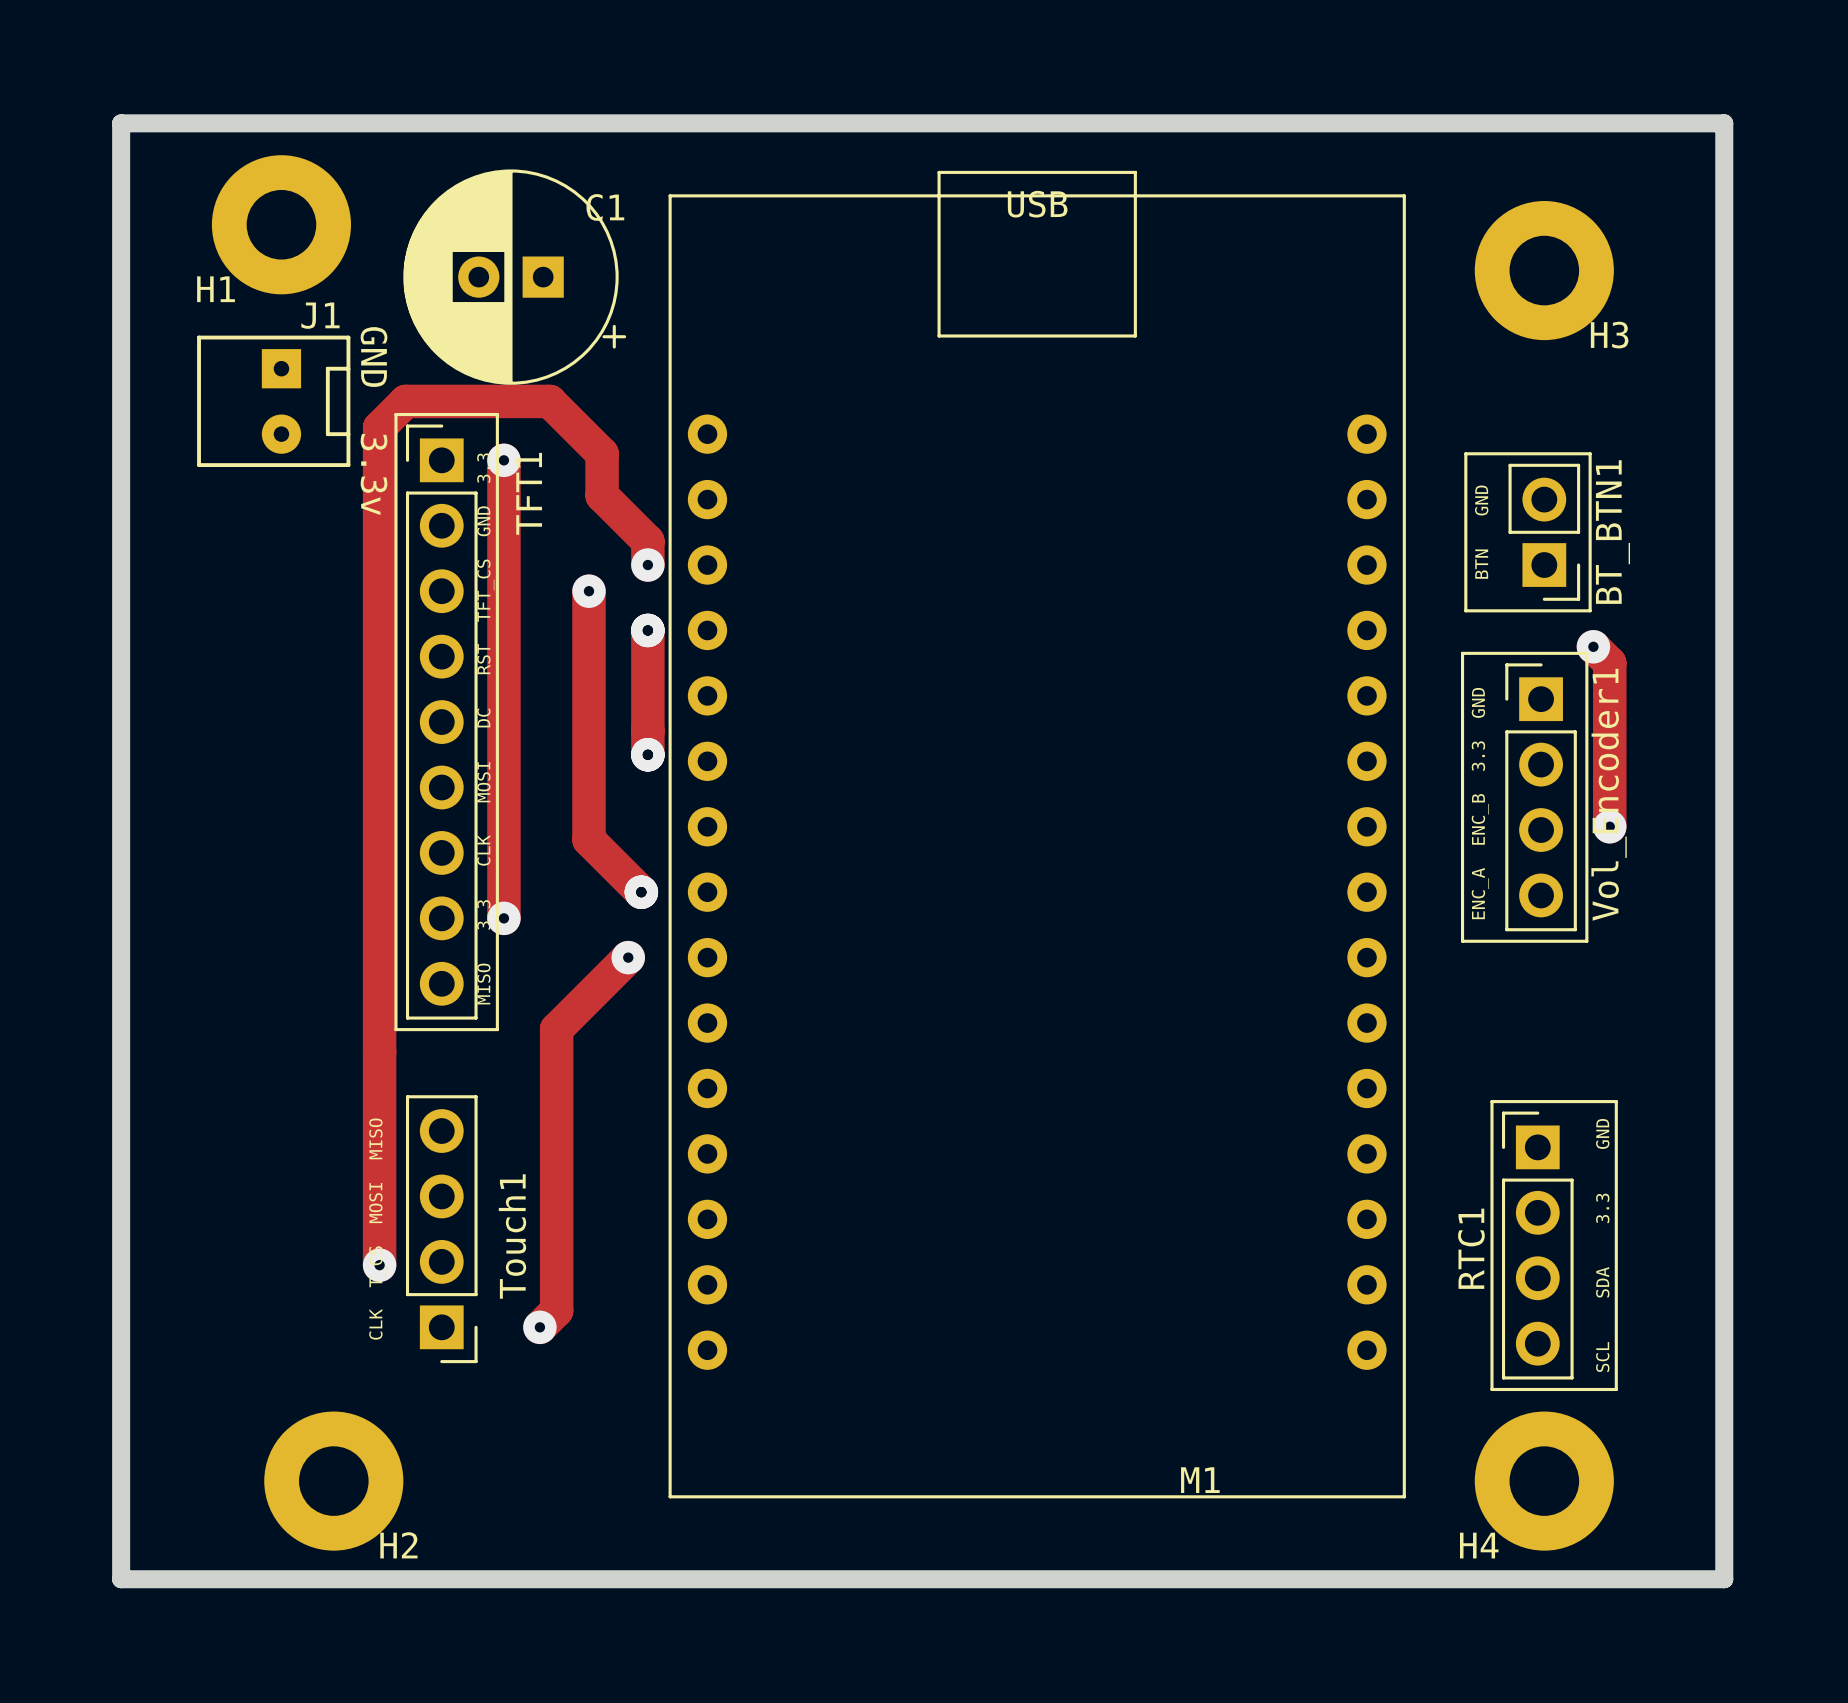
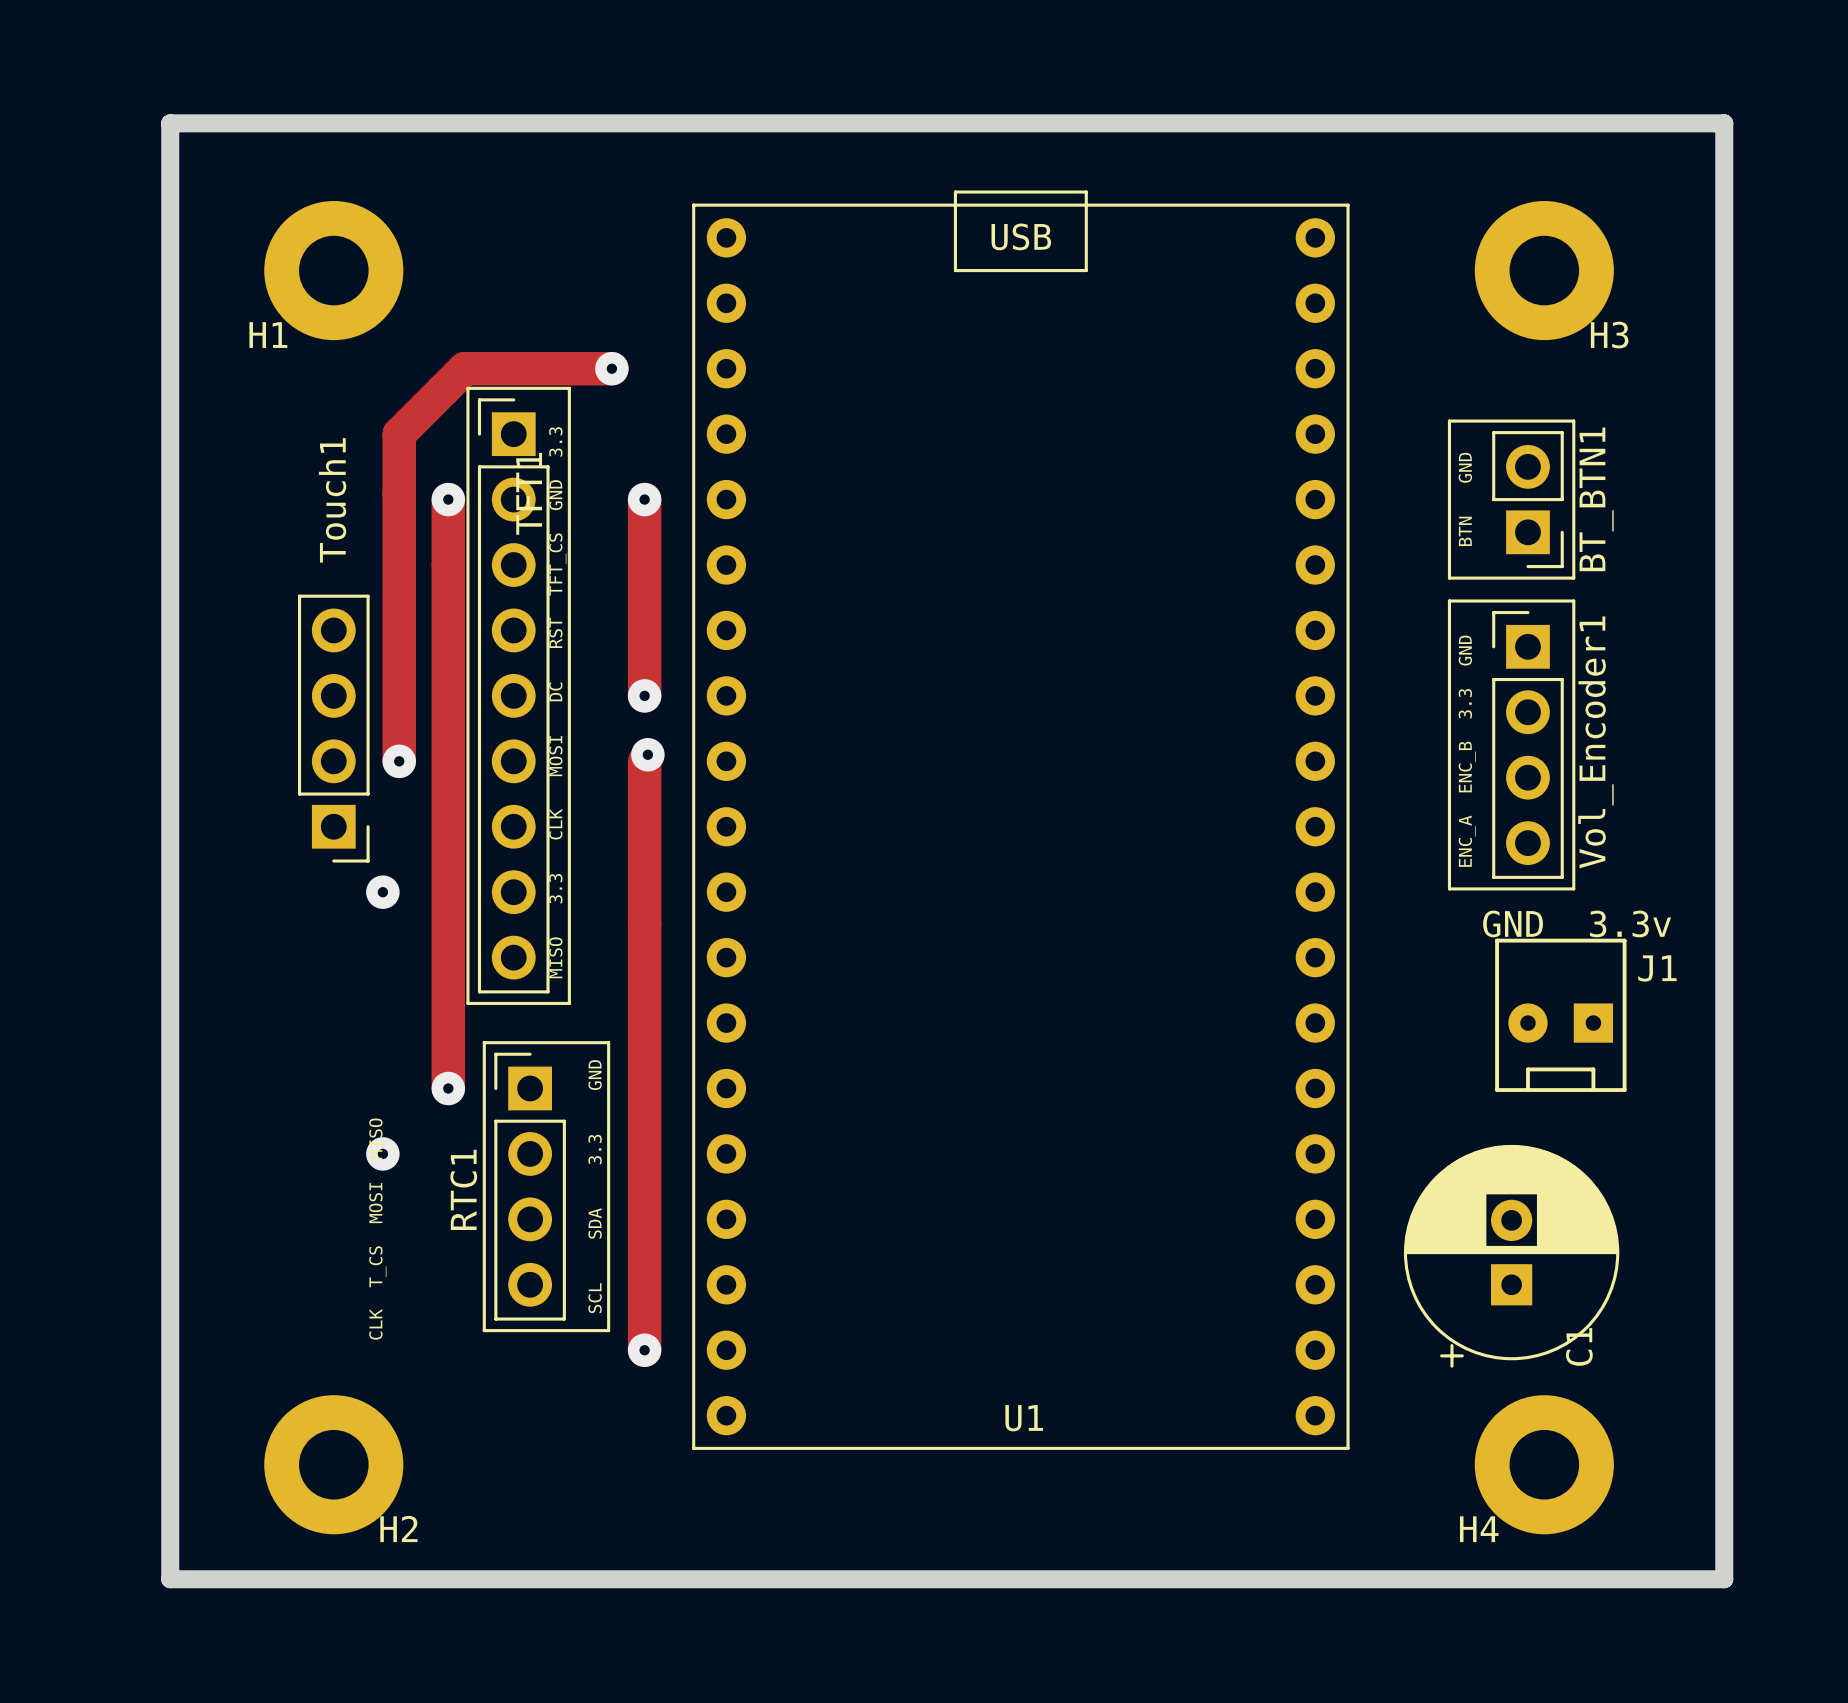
board edge: (170, 123) (121, 123) (121, 1579) (170, 1579) -> (170, 123) (170, 1579)
line: none -> (955, 192) (1086, 192) (1086, 270) (955, 270) (955, 192)
H1 position: (281, 224) -> (333, 270)
text: none -> USB (1021, 236)
C1 rotation: 0° (514, 277) -> 90° clockwise (1511, 1256)
C1 position: (514, 277) -> (1511, 1256)
J1 name position: J1 (320, 315) -> J1 (1657, 968)
track: none -> (611, 368) (464, 368) (399, 434) (399, 761)
via: none -> (611, 368)
J1 rotation: 0° (273, 401) -> 90° clockwise (1560, 1015)
J1 position: (273, 401) -> (1560, 1015)
line: (395, 414) (395, 1029) (497, 1029) (497, 414) (395, 414) -> (467, 388) (467, 1003) (569, 1003) (569, 388) (467, 388)
text: GND 3.3v (374, 421) -> none
line: (1465, 453) (1465, 610) (1590, 610) (1590, 453) (1465, 453) -> (1449, 421) (1449, 578) (1573, 578) (1573, 421) (1449, 421)
track: (503, 460) (503, 918) -> none
via position: (503, 460) -> (448, 499)
track: none -> (448, 499) (448, 1088)
track: none -> (644, 499) (644, 695)
via: none -> (644, 499)
text position: BTN GND (1481, 532) -> BTN GND (1465, 499)
BT_BTN1 position: (1544, 532) -> (1527, 499)
track: (647, 565) (647, 541) (602, 495) (602, 453) (549, 401) (405, 401) (379, 427) (379, 1265) -> none
via: (647, 565) -> none
track: (589, 591) (589, 839) (641, 892) -> none
via: (589, 591) -> none
track: (647, 630) (647, 754) -> none
via: (647, 630) -> none
track: (1593, 646) (1609, 663) (1609, 826) -> none
via: (1593, 646) -> none
line: (1462, 653) (1462, 941) (1586, 941) (1586, 653) (1462, 653) -> (1449, 601) (1449, 888) (1573, 888) (1573, 601) (1449, 601)
via: none -> (644, 695)
TFT1 position: (441, 722) -> (513, 695)
text position: MISO 3.3 CLK MOSI DC RST TFT_CS GND 3.3 (485, 728) -> MISO 3.3 CLK MOSI DC RST TFT_CS GND 3.3 (557, 702)
via: none -> (399, 761)
track: none -> (644, 761) (644, 1350)
Vol_Encoder1 position: (1541, 797) -> (1527, 744)
text position: ENC_A ENC_B 3.3 GND (1480, 803) -> ENC_A ENC_B 3.3 GND (1467, 751)
U1: none -> (1020, 826)
via: (1609, 826) -> none
M1: (1037, 834) -> none
via: none -> (382, 892)
via: (641, 892) -> none
via: (503, 918) -> none
text: none -> GND 3.3v (1577, 923)
track: (628, 957) (556, 1029) (556, 1310) (539, 1327) -> none
via: (628, 957) -> none
line: none -> (484, 1042) (484, 1330) (608, 1330) (608, 1042) (484, 1042)
via: none -> (448, 1088)
line: (1491, 1101) (1491, 1389) (1616, 1389) (1616, 1101) (1491, 1101) -> none
via: none -> (382, 1153)
text: none -> SCL SDA 3.3 GND (595, 1186)
Touch1 position: (441, 1229) -> (333, 728)
Touch1 name position: Touch1 (512, 1236) -> Touch1 (332, 500)
RTC1 position: (1537, 1245) -> (530, 1186)
text: SCL SDA 3.3 GND (1602, 1245) -> none
via: (379, 1265) -> none
via position: (539, 1327) -> (644, 1350)
H2 position: (333, 1481) -> (333, 1464)
H4 position: (1544, 1481) -> (1544, 1464)

